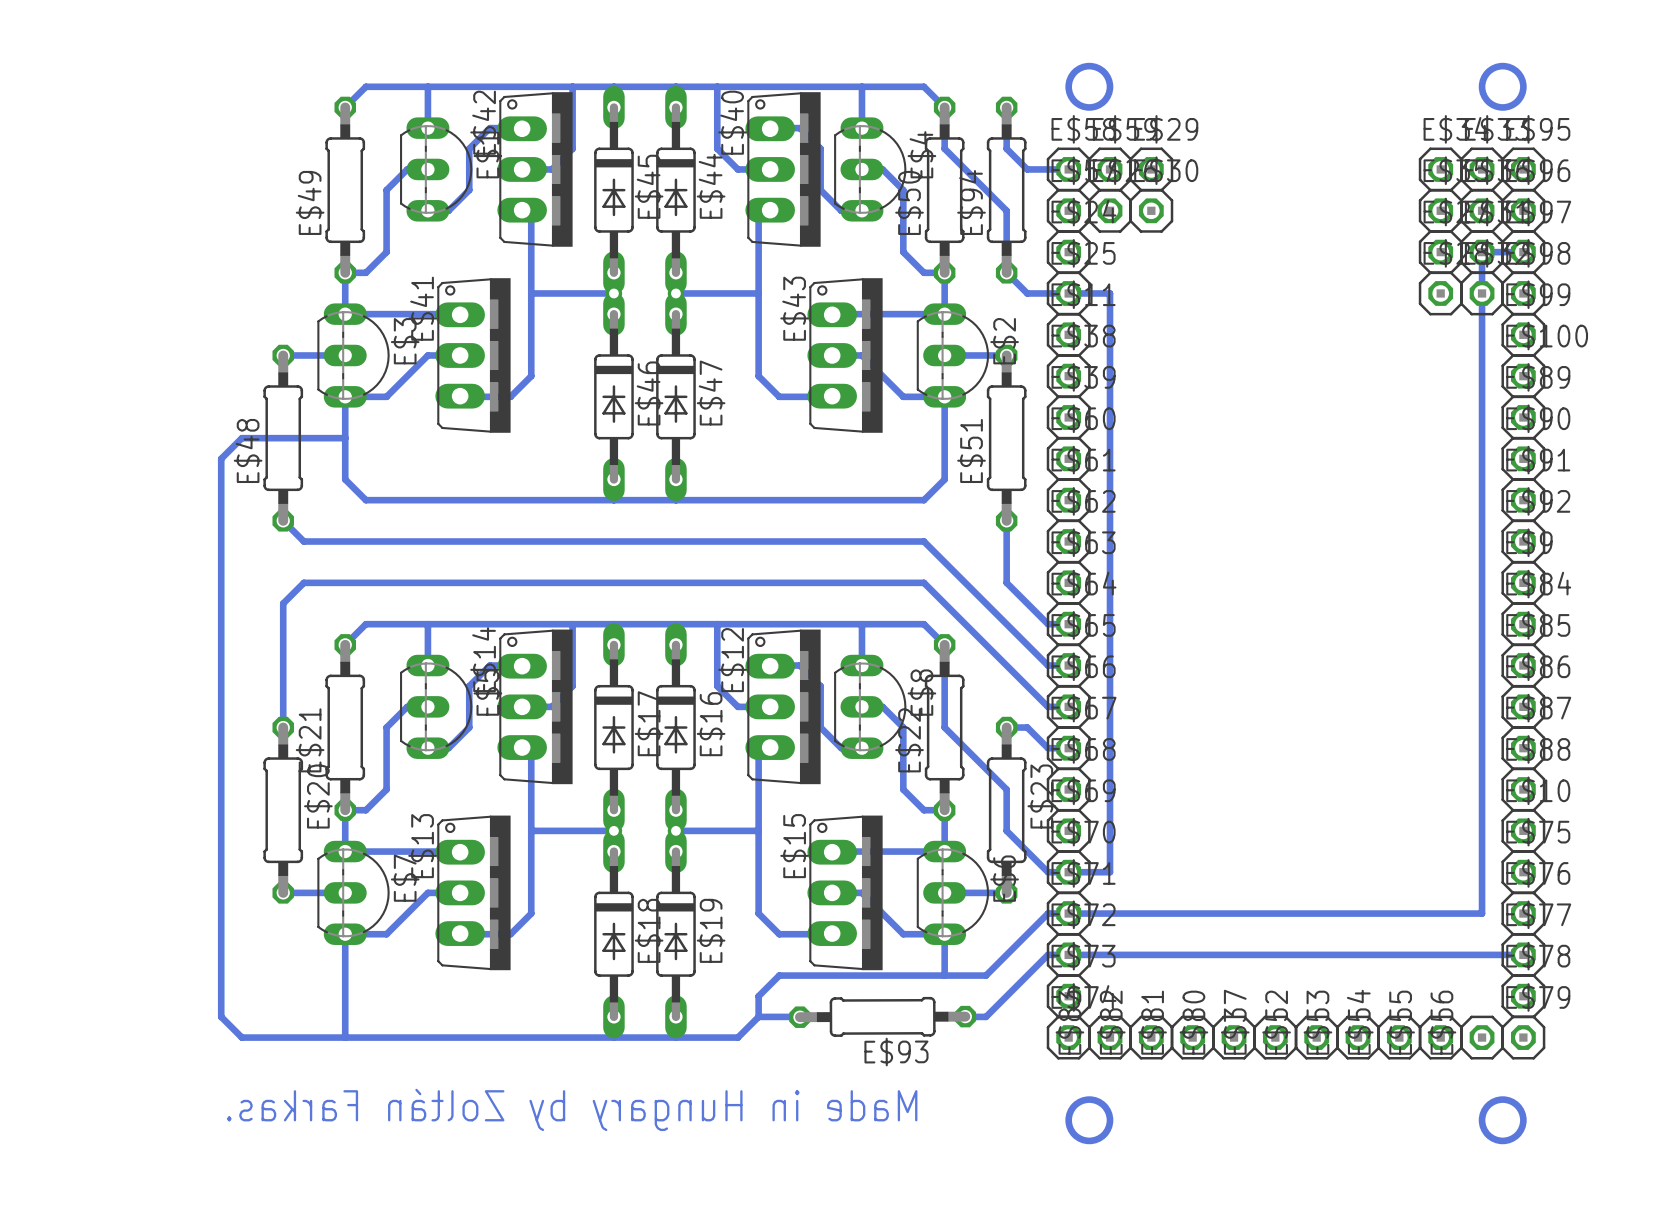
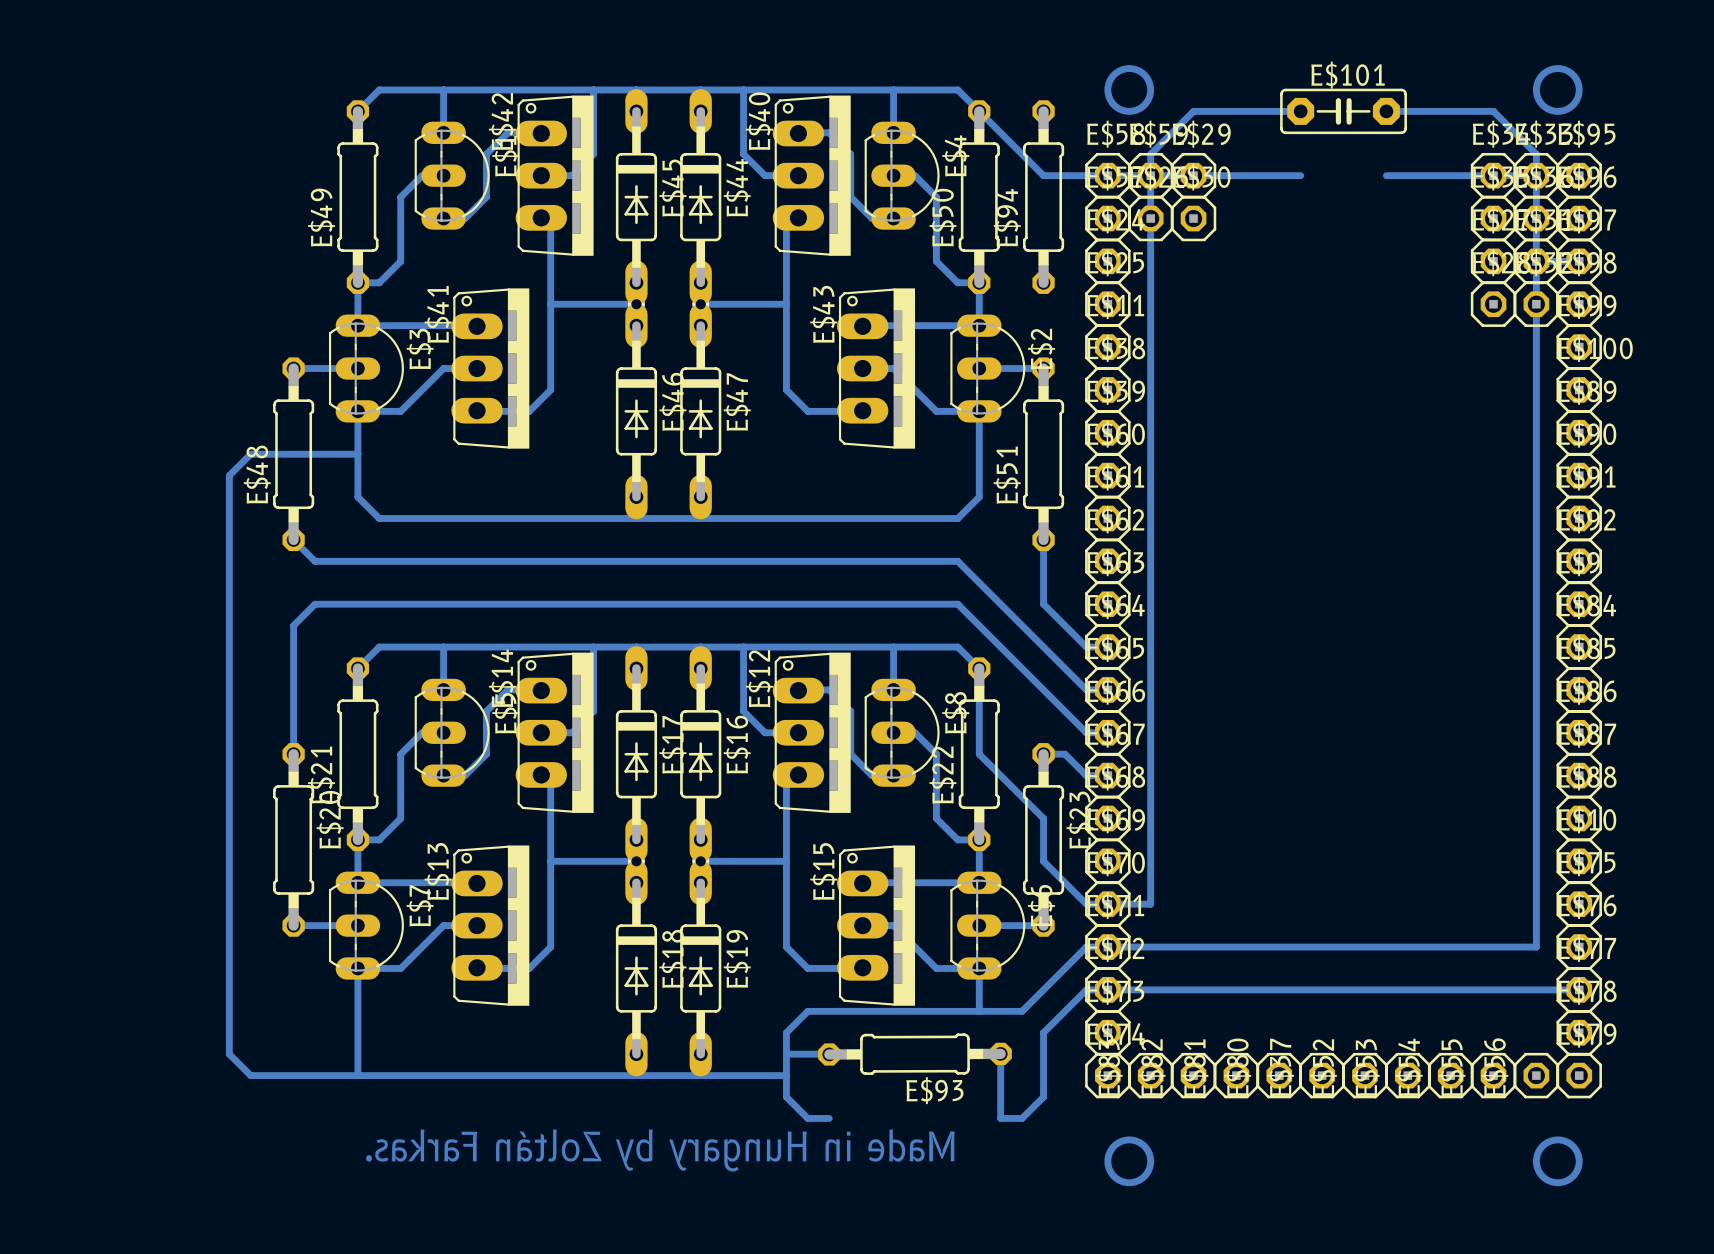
bottom track: (944, 107) (944, 148) (1006, 210) (1006, 272) (1027, 293) (1110, 293) -> (1300, 111) (1193, 111) (1150, 154) (1150, 304)
bottom track: (1006, 107) (1006, 148) (1027, 169) -> (979, 111) (1043, 175) (1064, 175)
E$101: none -> (1343, 111)
bottom track: none -> (1386, 111) (1493, 111) (1536, 154) (1536, 261)
bottom track: none -> (1107, 175) (1300, 175)
bottom track: none -> (1386, 175) (1536, 175)
bottom track: (1006, 996) (985, 1016) (965, 1016) -> (1043, 1032) (1043, 1097) (1022, 1118) (1000, 1118) (1000, 1054)
bottom track: (758, 1016) (737, 1037) -> (786, 1075) (765, 1075)
bottom track: none -> (786, 1054) (786, 1097) (807, 1118) (829, 1118)

